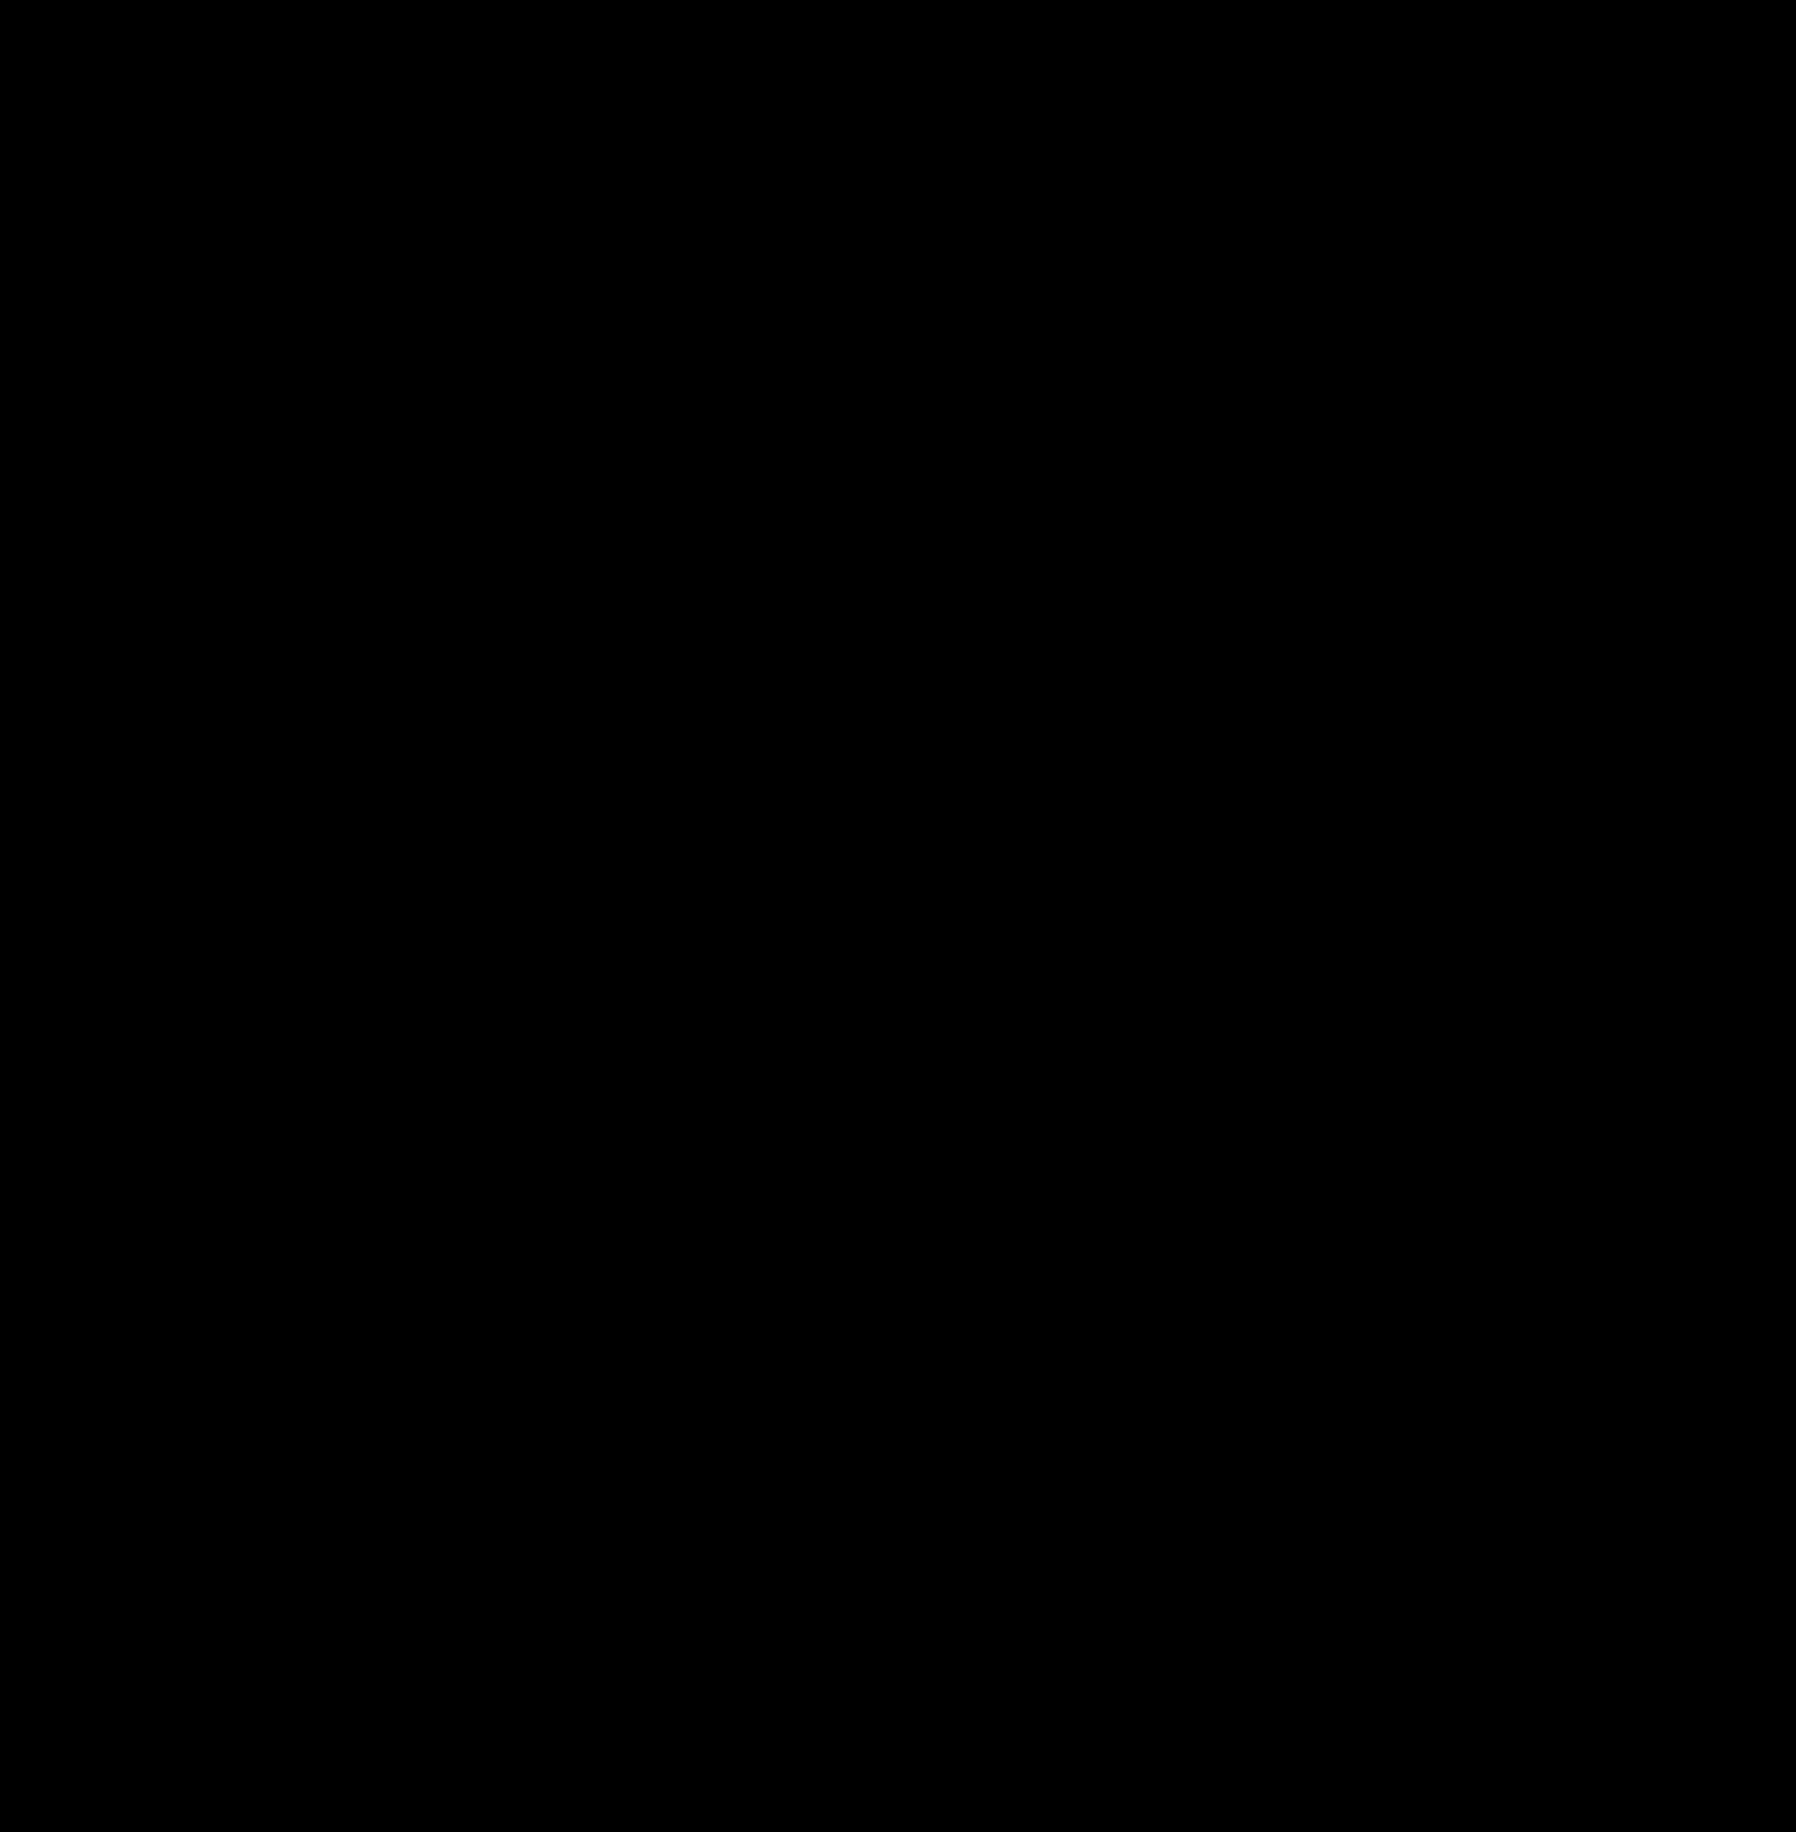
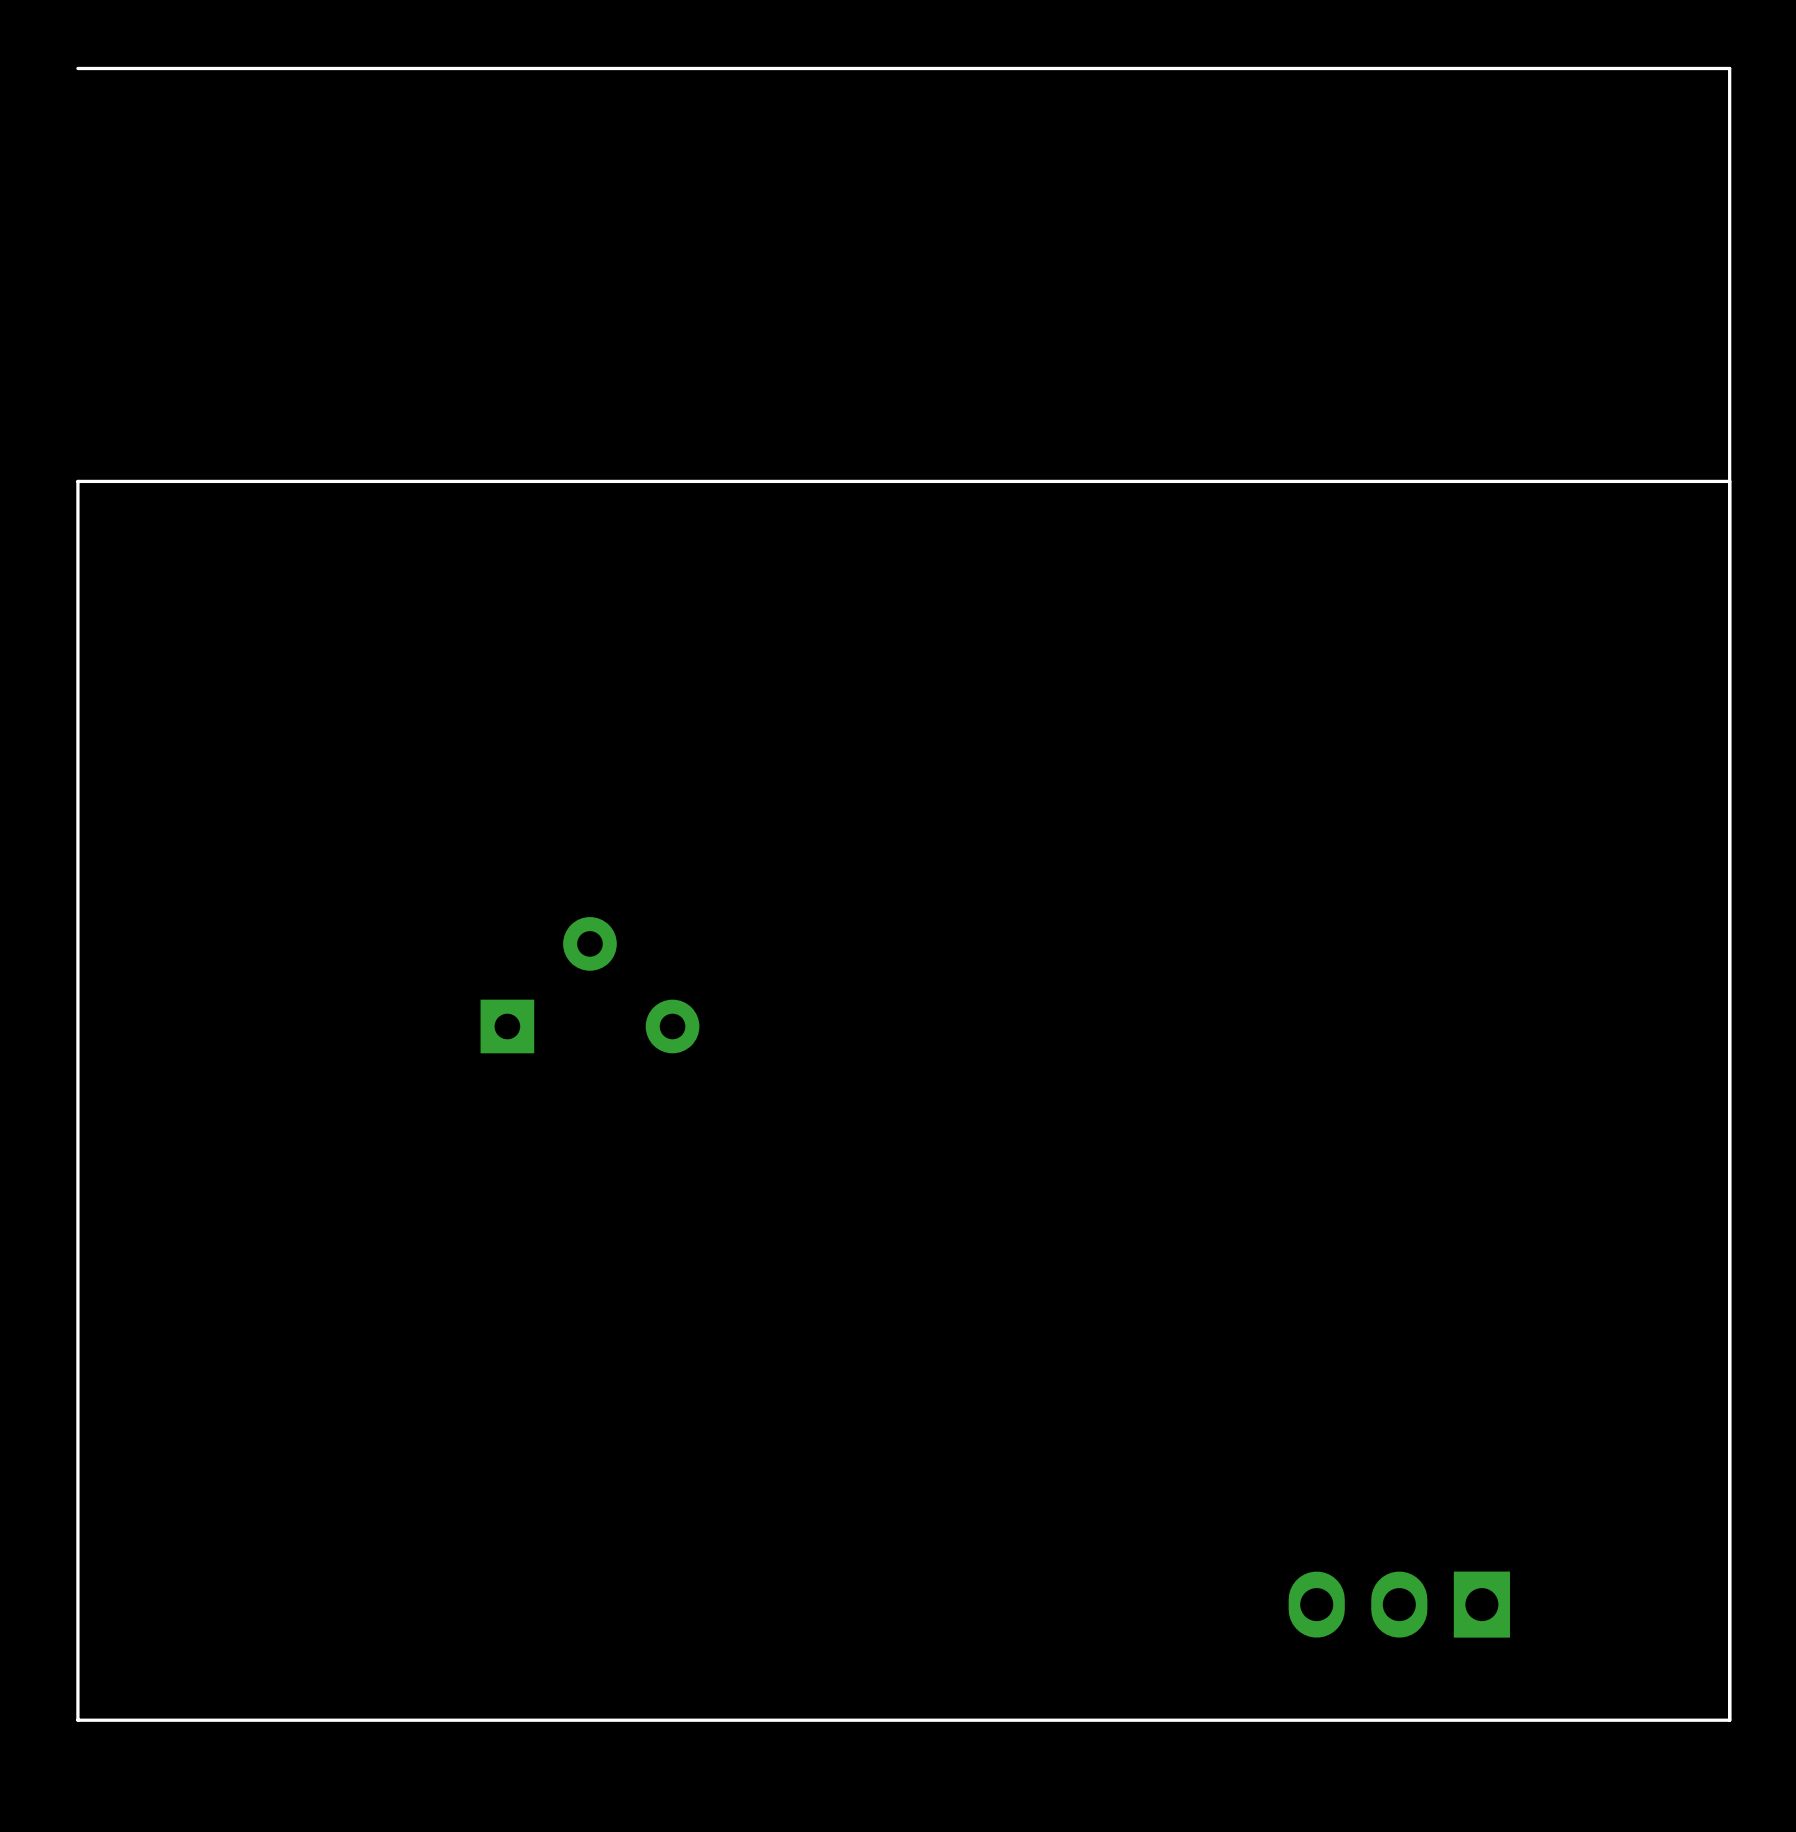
board edge: none -> (77, 68) (1729, 68) (1729, 1720) (77, 1720) (77, 481) (1729, 481)
part: none -> (589, 985)
part: none -> (1399, 1604)

